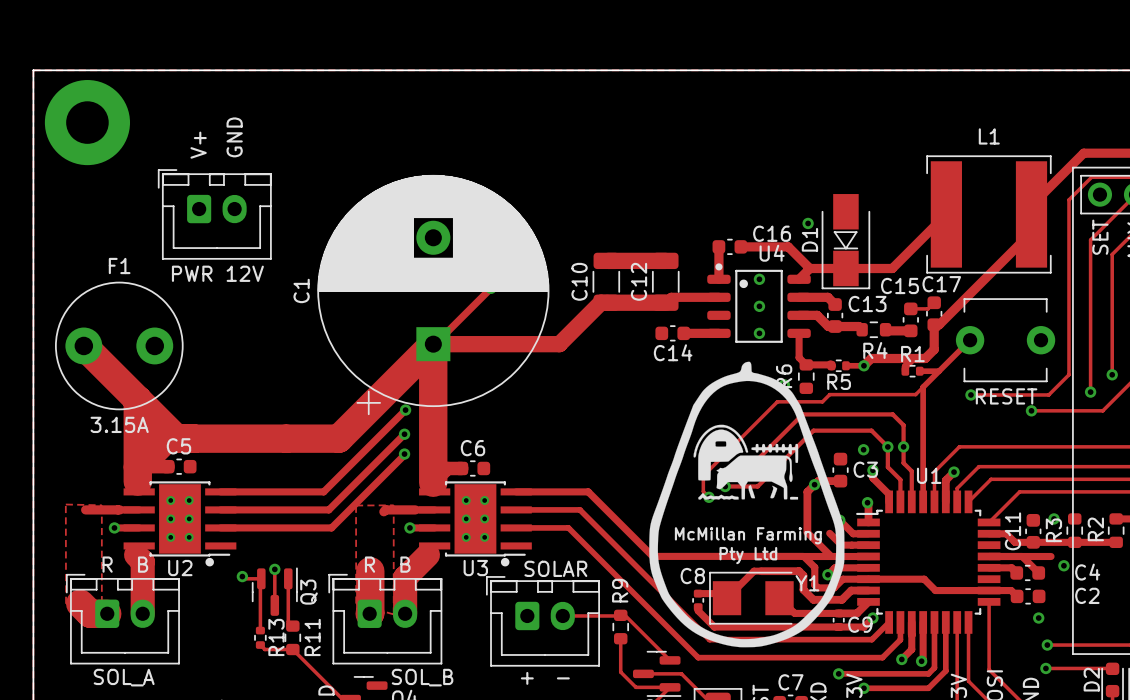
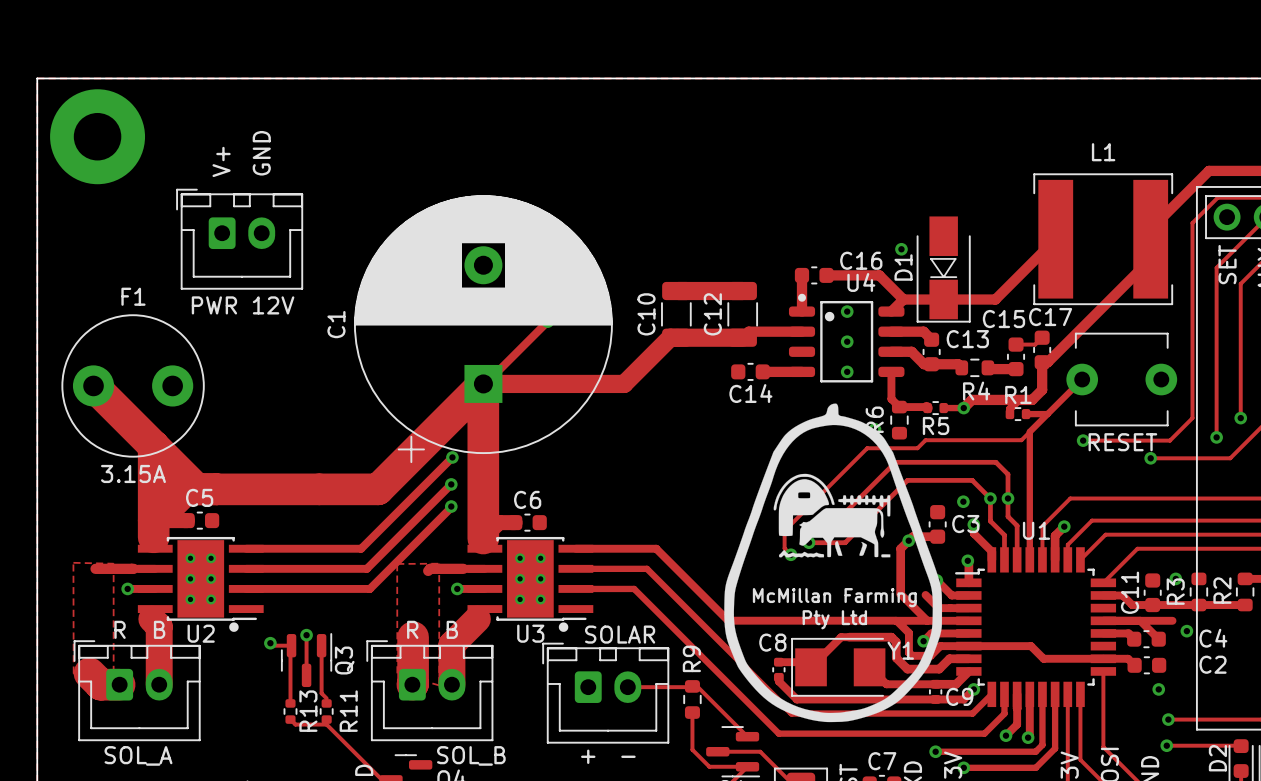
R11 footprint: [284, 620, 302, 656] -> [319, 699, 334, 724]

